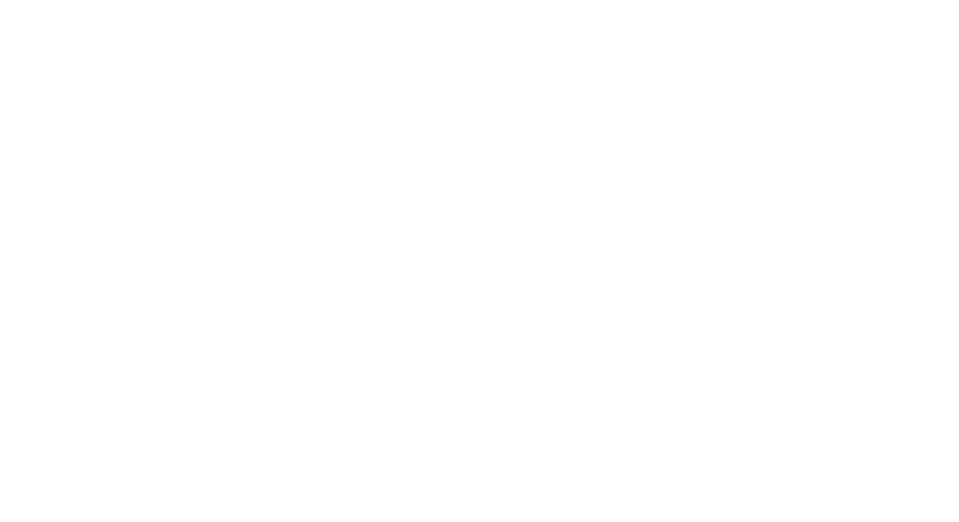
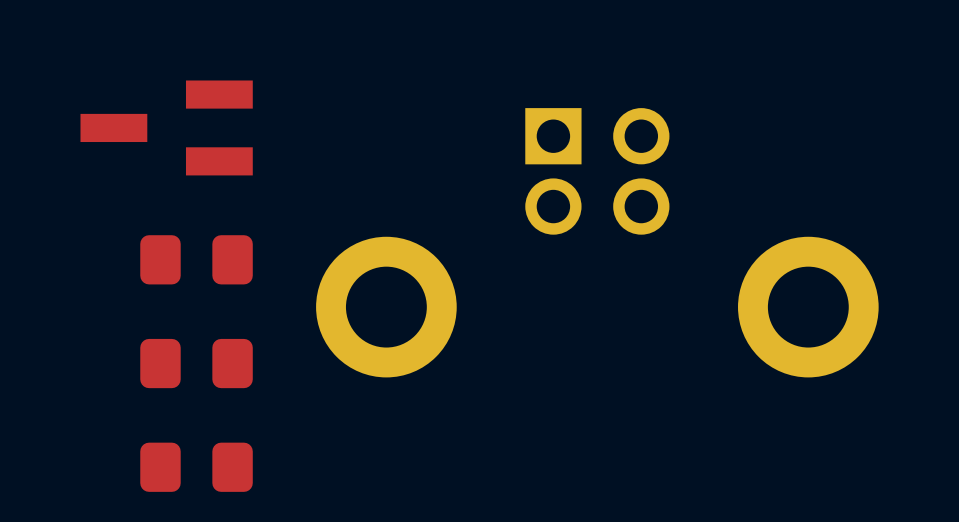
part: none -> (166, 127)
part: none -> (597, 242)
part: none -> (196, 259)
part: none -> (196, 363)
part: none -> (196, 467)

